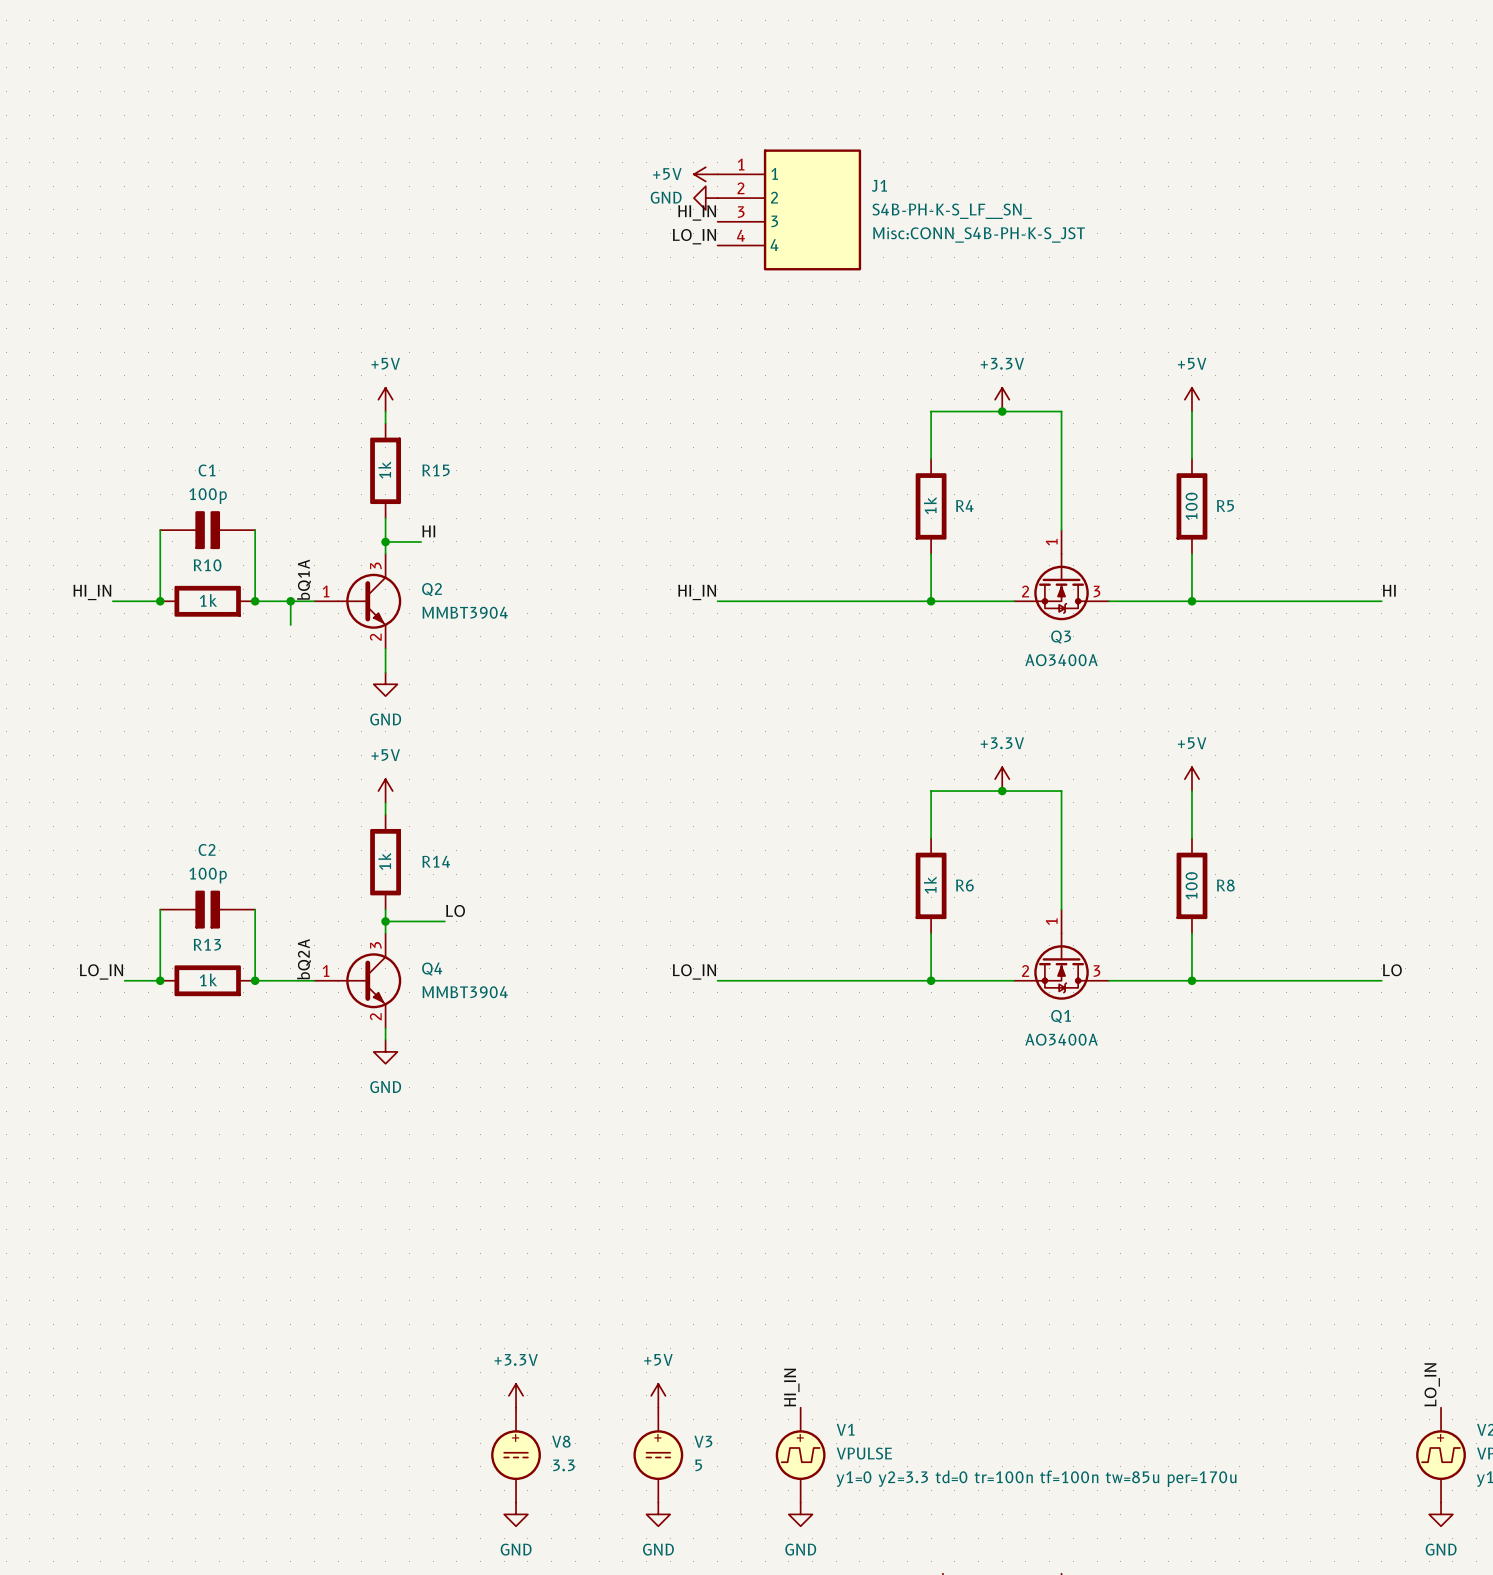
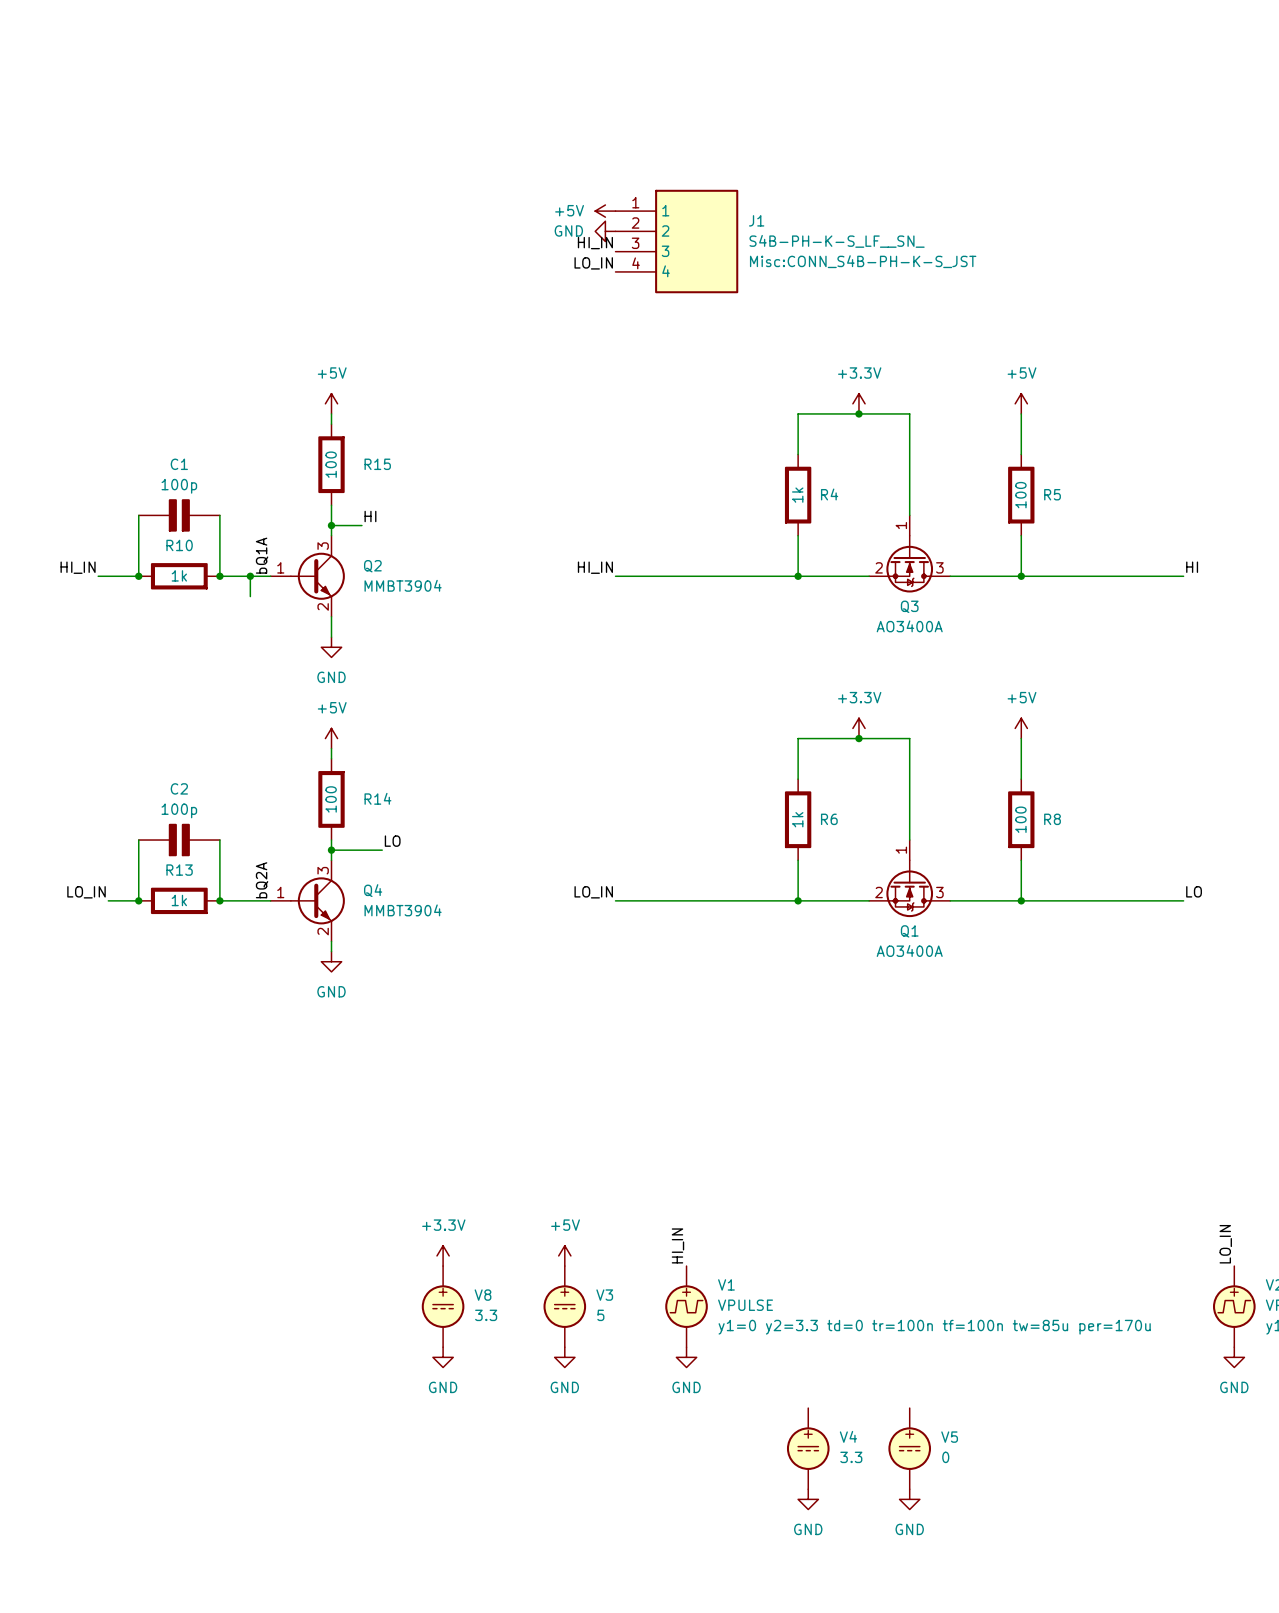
R15 value: 1k (384, 470) -> 100 (331, 464)
R14 value: 1k (384, 861) -> 100 (331, 799)

